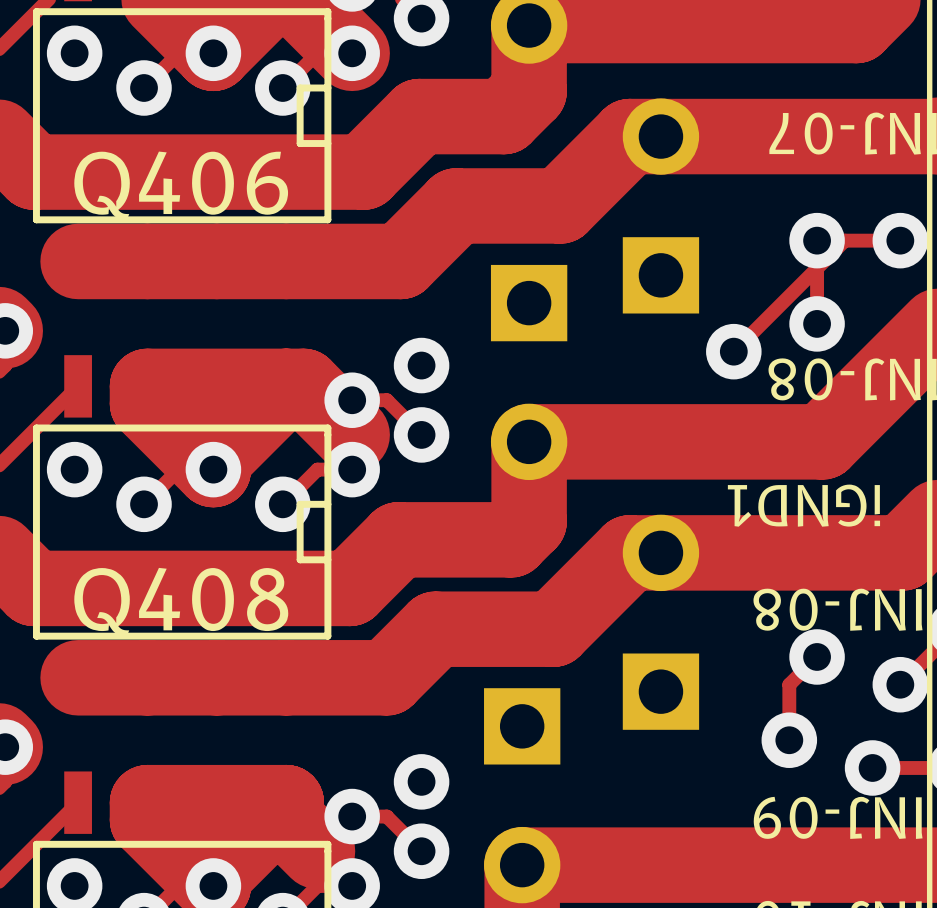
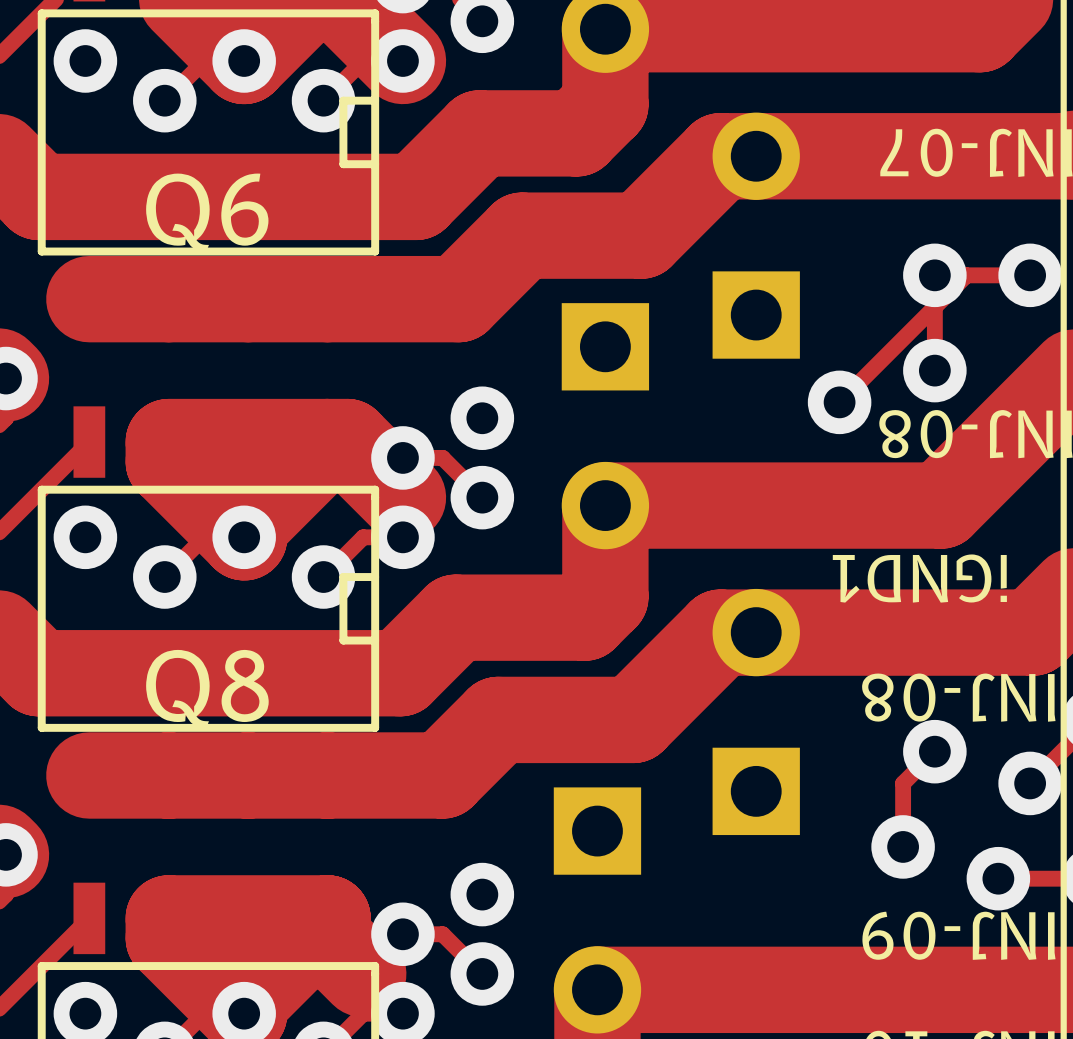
Q406 name: Q406 (181, 185) -> Q6 (207, 212)
Q408 name: Q408 (181, 602) -> Q8 (207, 688)

